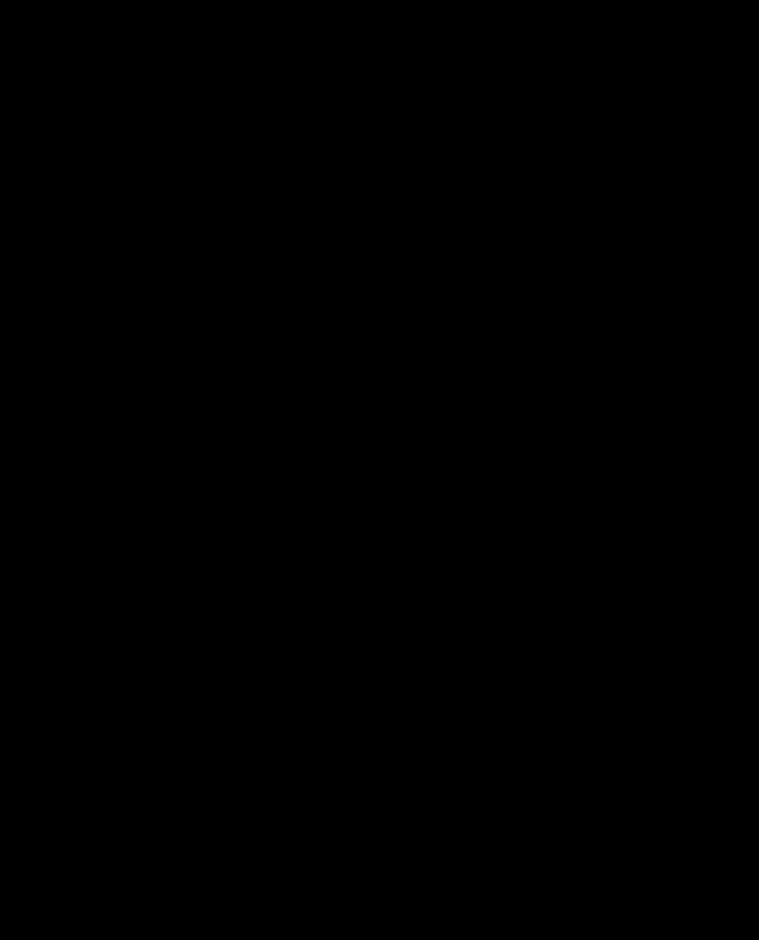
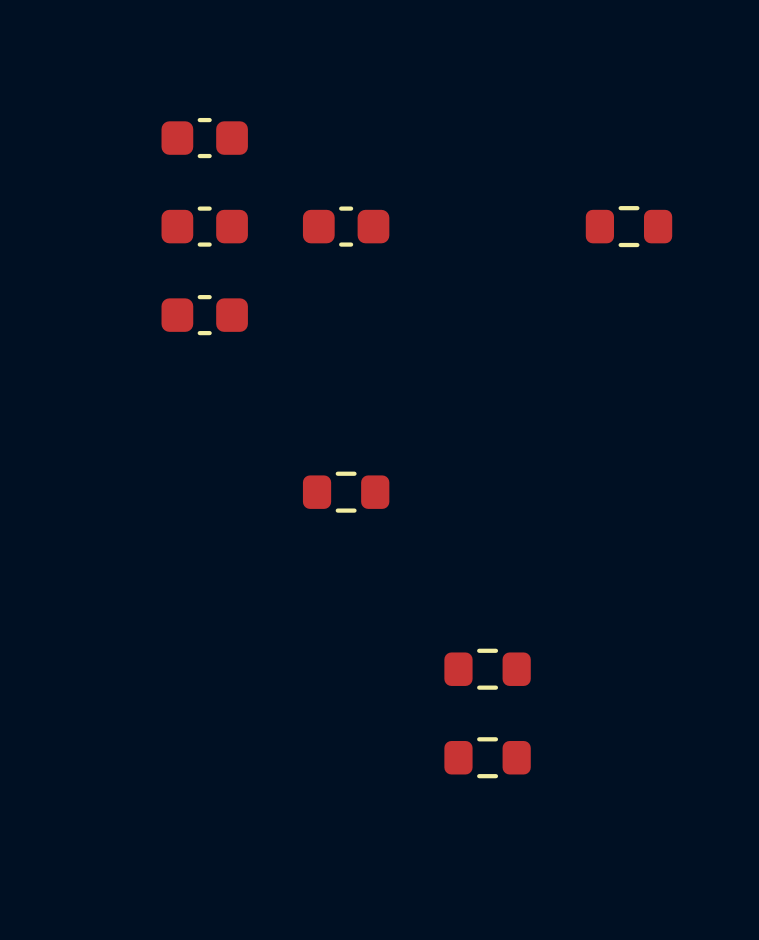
part: none -> (204, 138)
part: none -> (204, 226)
part: none -> (346, 226)
part: none -> (629, 226)
part: none -> (204, 315)
part: none -> (346, 492)
part: none -> (487, 669)
part: none -> (487, 757)

